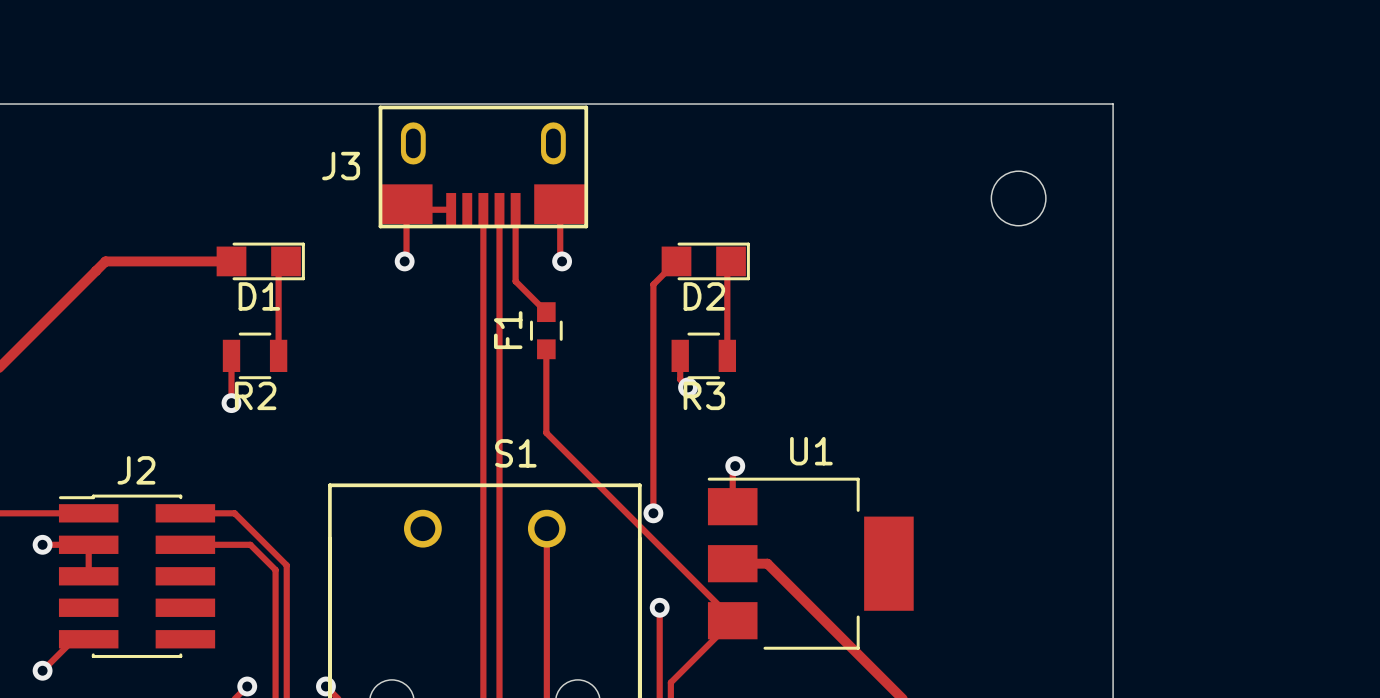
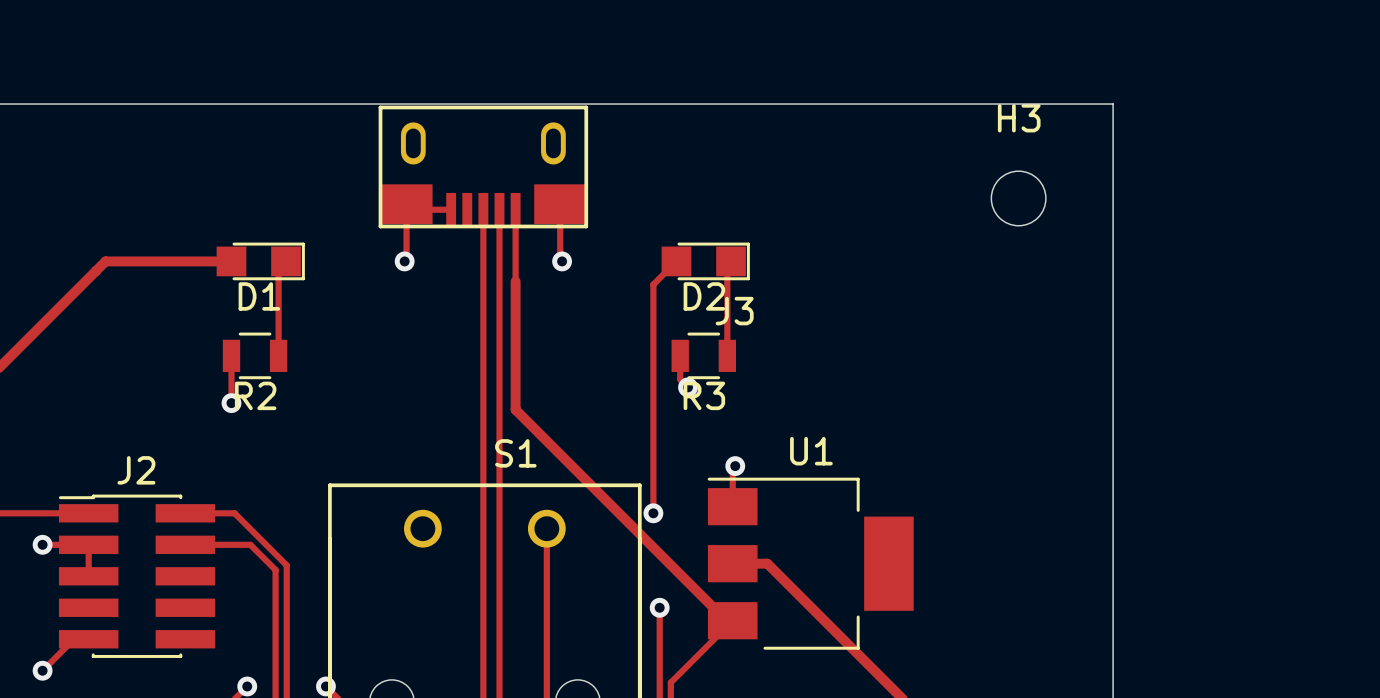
H3 name: none -> H3 (1019, 118)
J3 name position: J3 (341, 166) -> J3 (734, 311)
track: (515, 281) (546, 312) -> (515, 281) (515, 409) (726, 620)
F1: (546, 330) -> none
track: (546, 349) (546, 432) (732, 620) -> none

